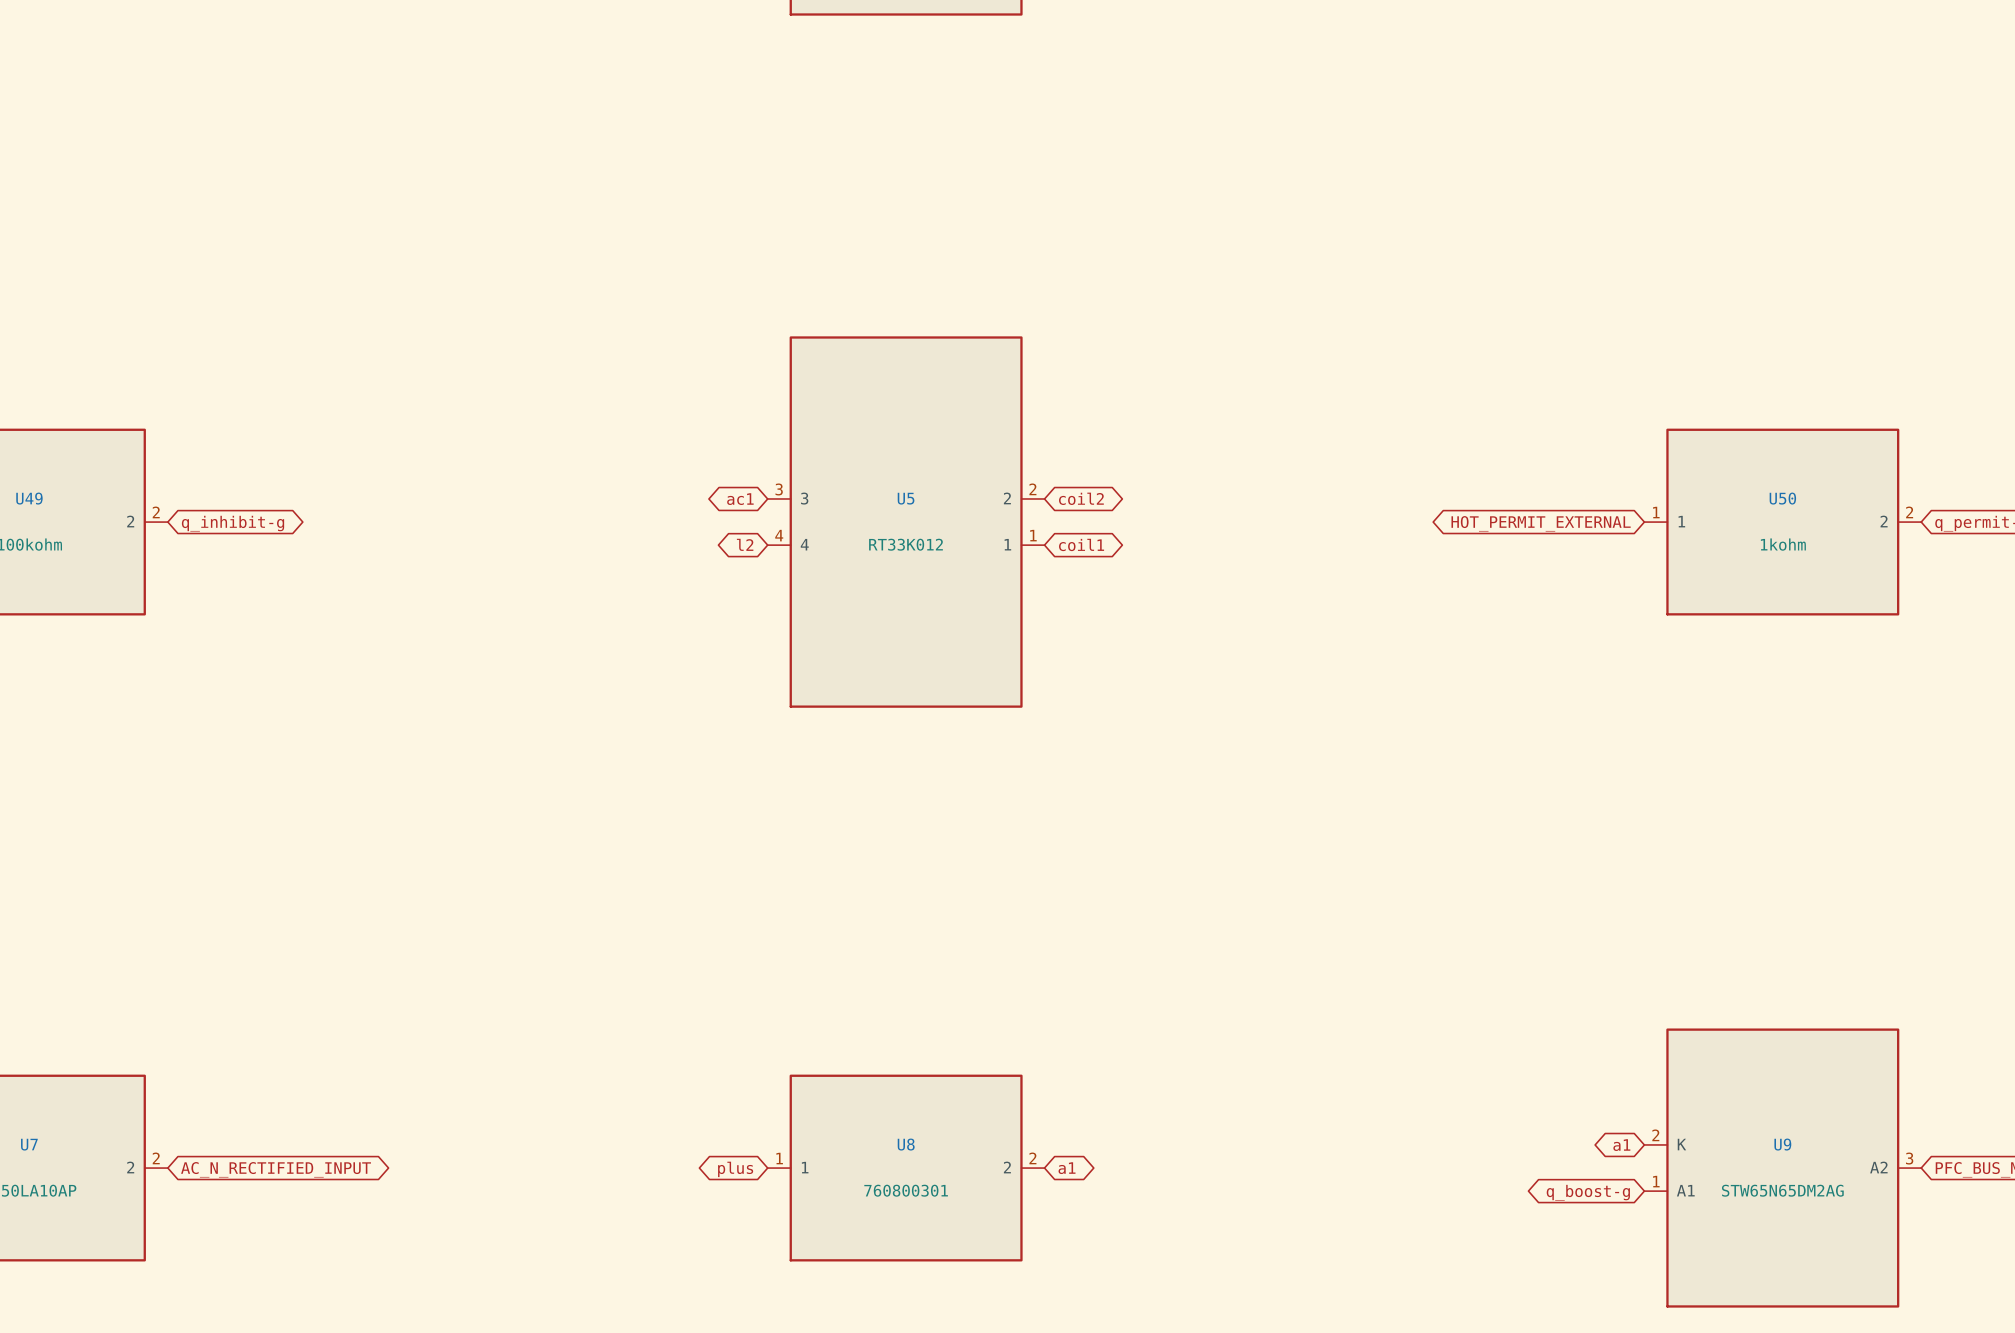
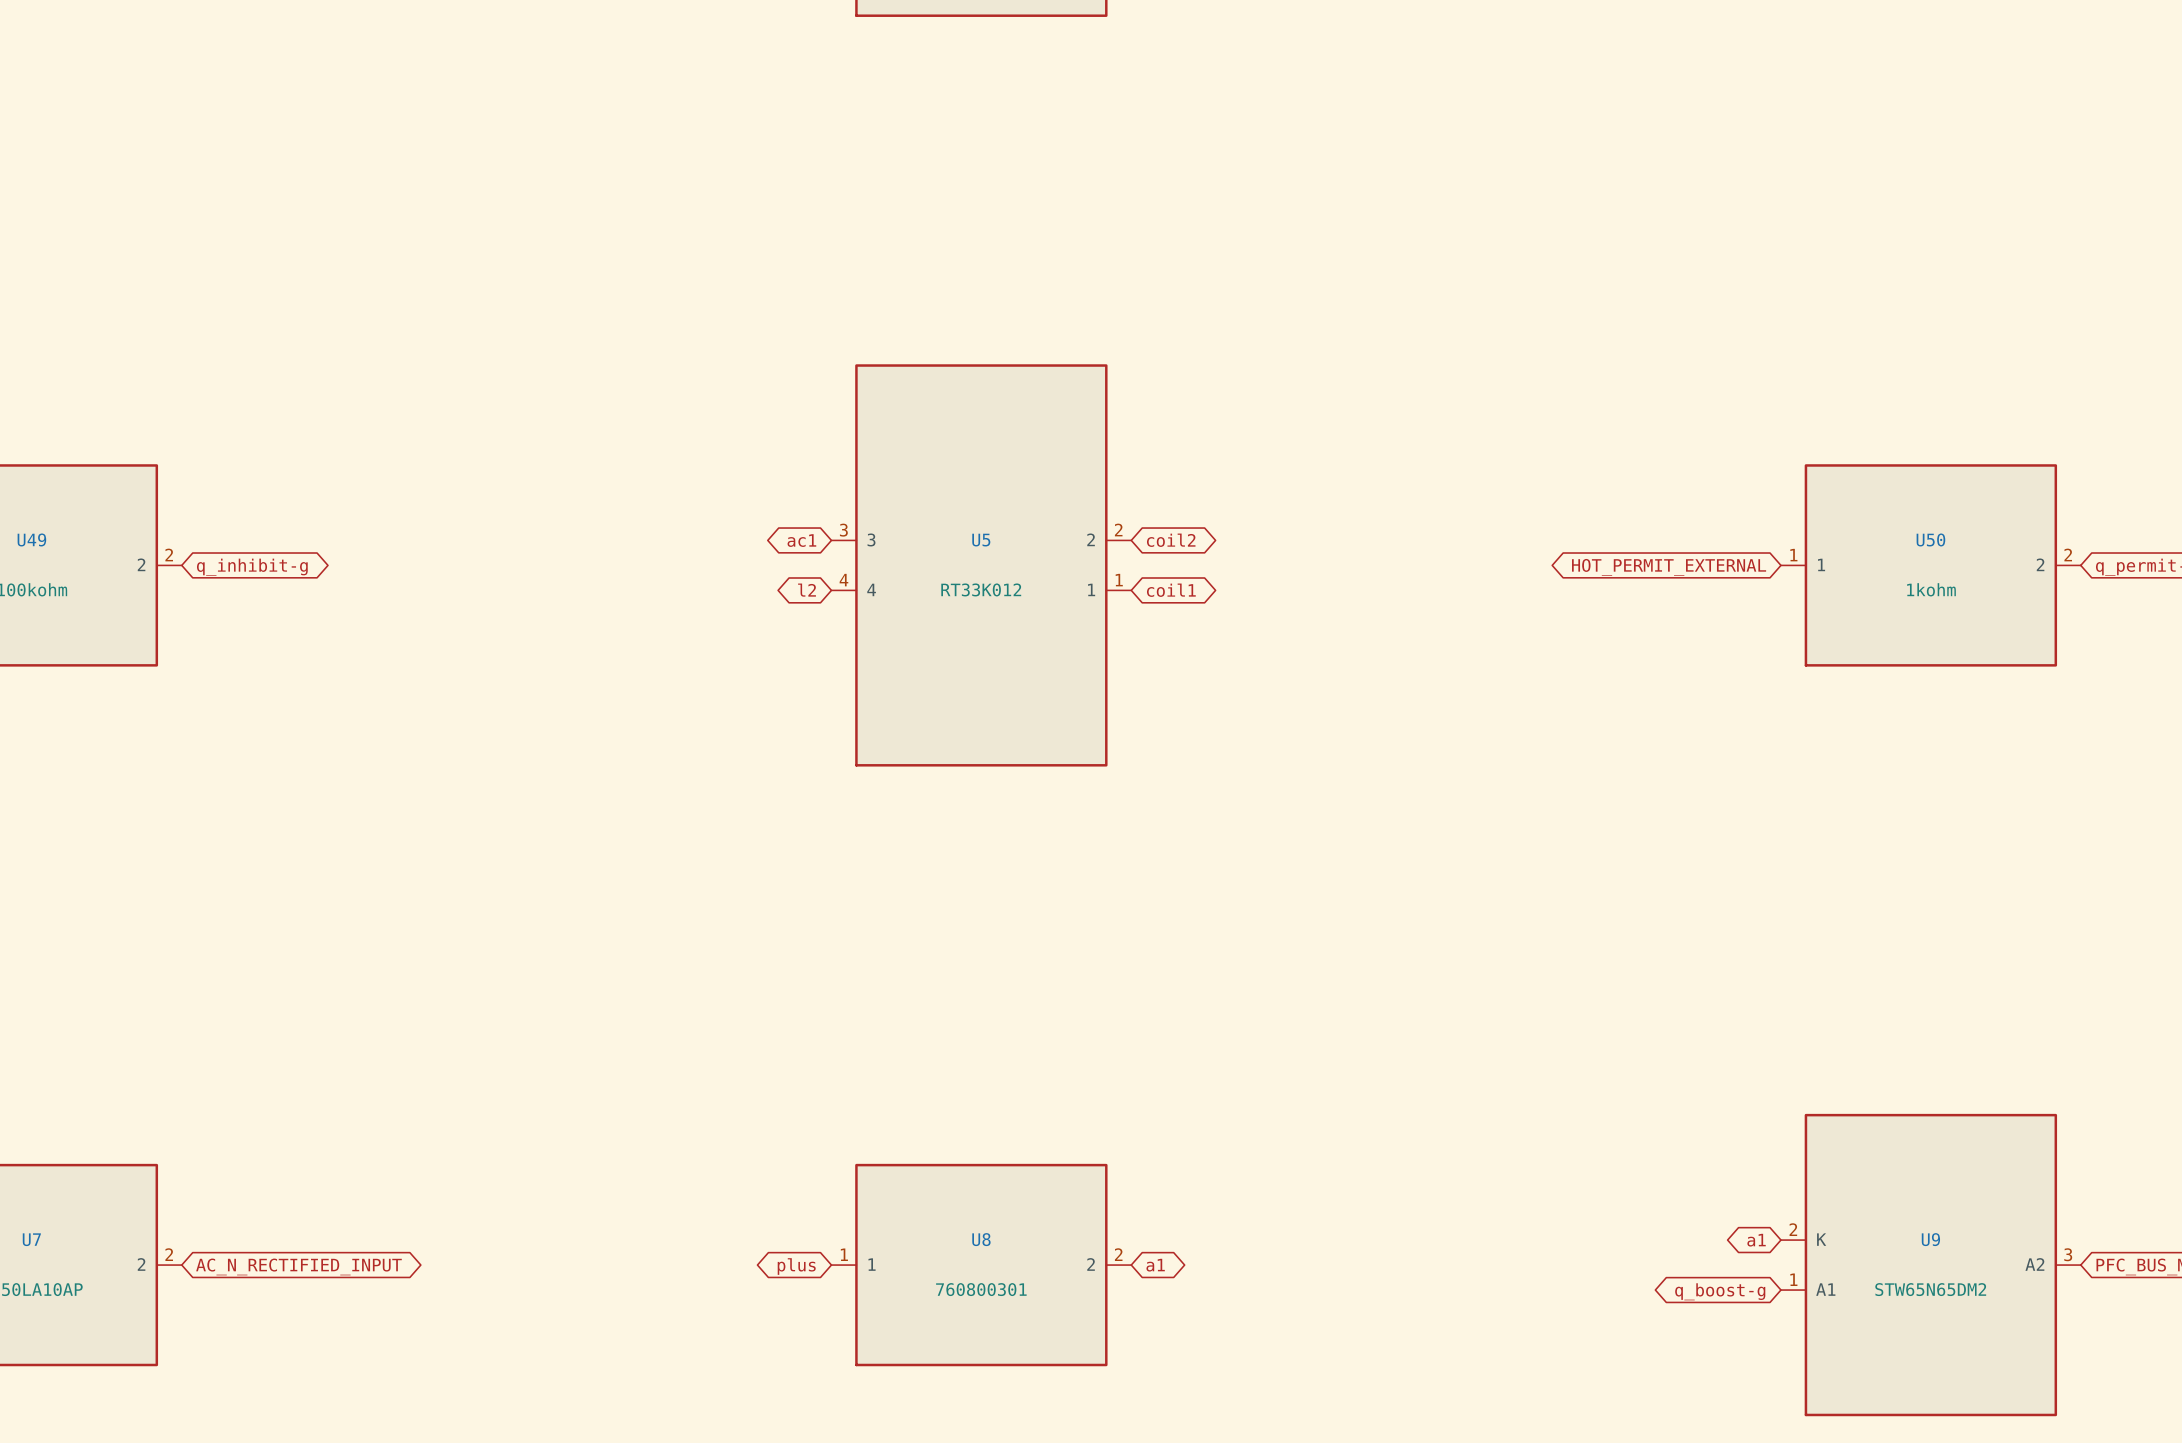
U9 value: STW65N65DM2AG (1782, 1190) -> STW65N65DM2 (1930, 1289)

